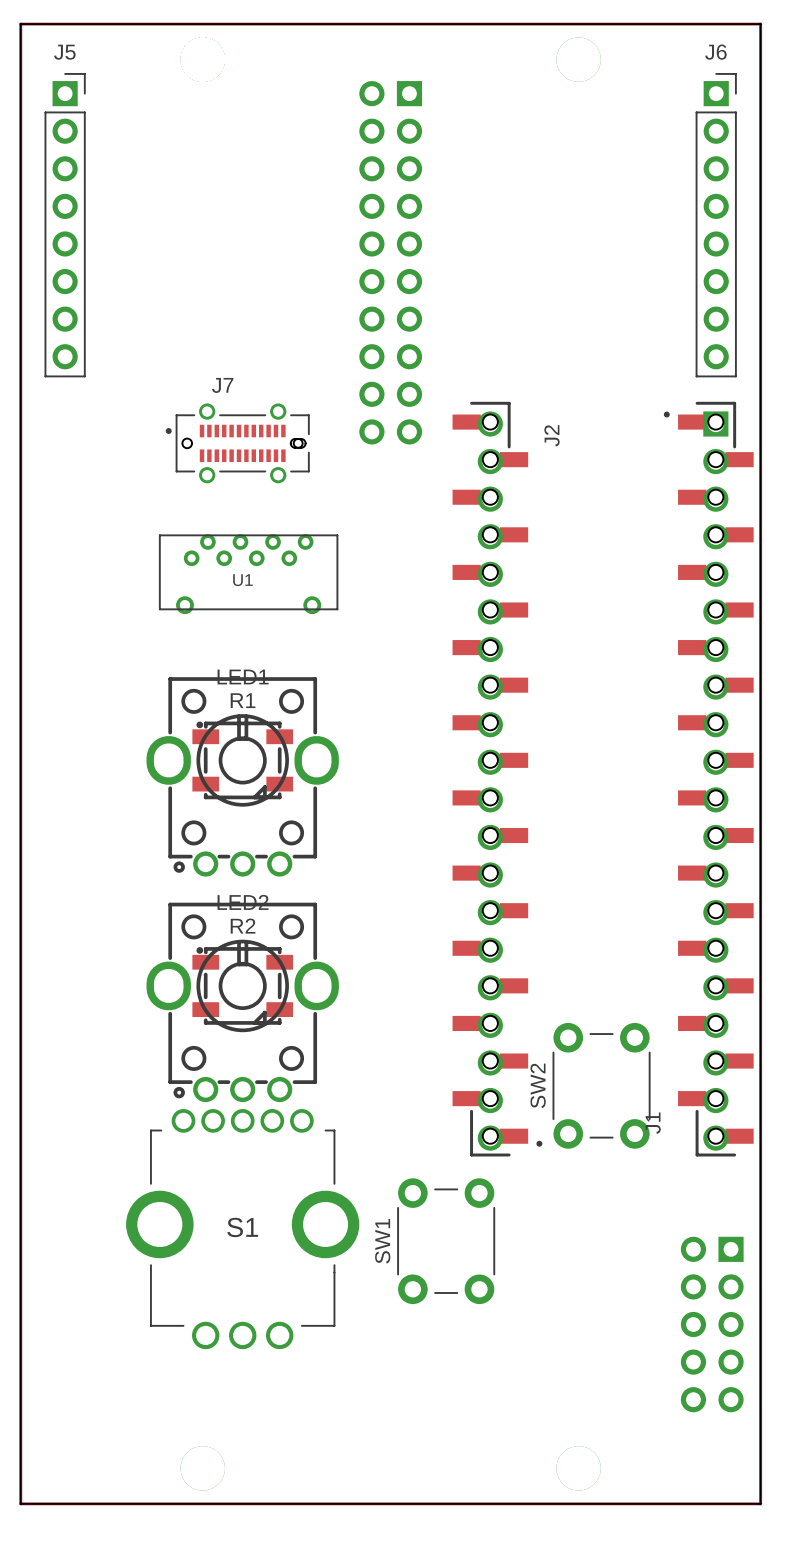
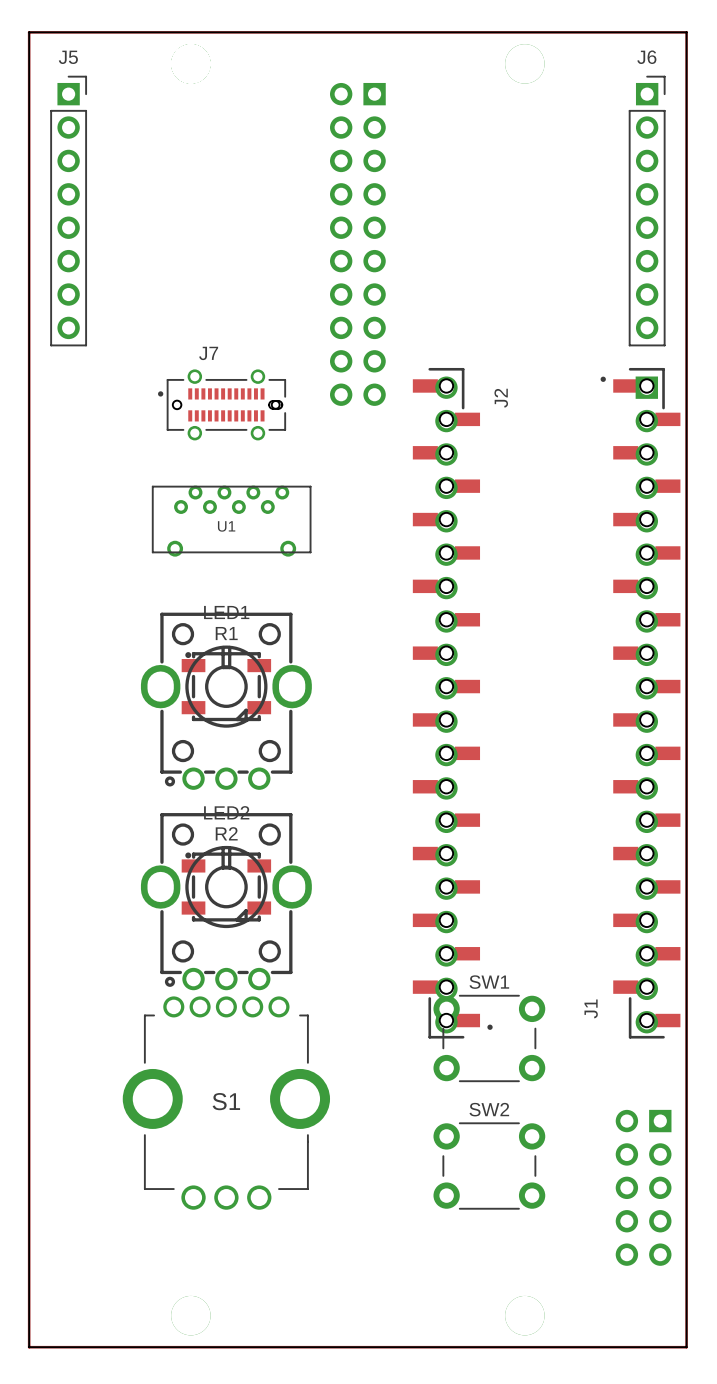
SW2 rotation: 0° (601, 1085) -> 90° clockwise (489, 1166)
SW2 position: (601, 1085) -> (489, 1166)
SW1 rotation: 0° (446, 1241) -> 90° clockwise (489, 1038)
SW1 position: (446, 1241) -> (489, 1038)

